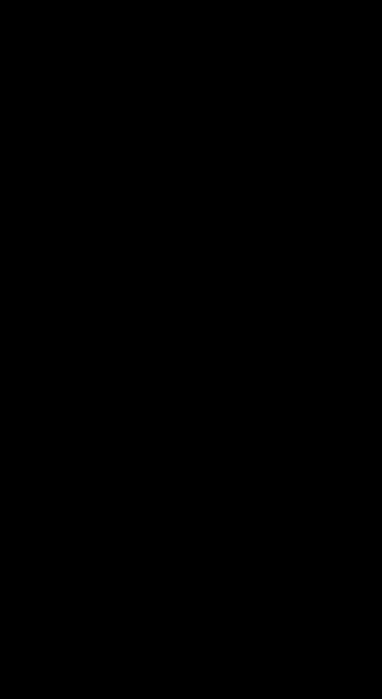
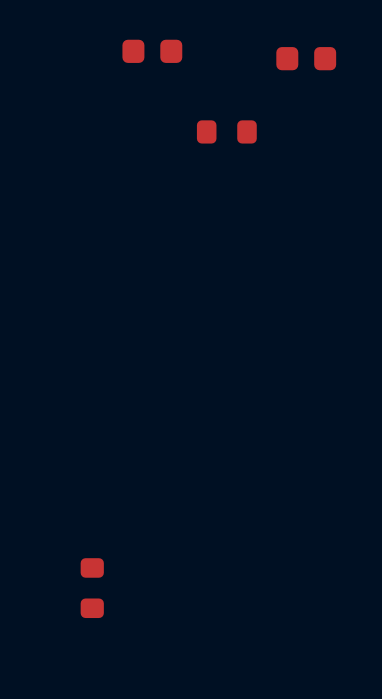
part: none -> (152, 51)
part: none -> (306, 58)
part: none -> (226, 131)
part: none -> (92, 588)

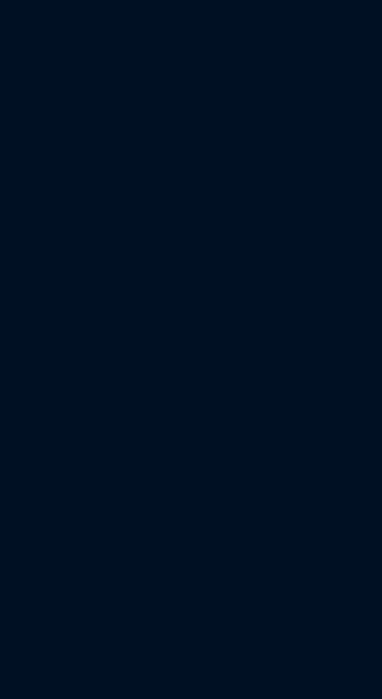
part: (152, 51) -> none
part: (306, 58) -> none
part: (226, 131) -> none
part: (92, 588) -> none

